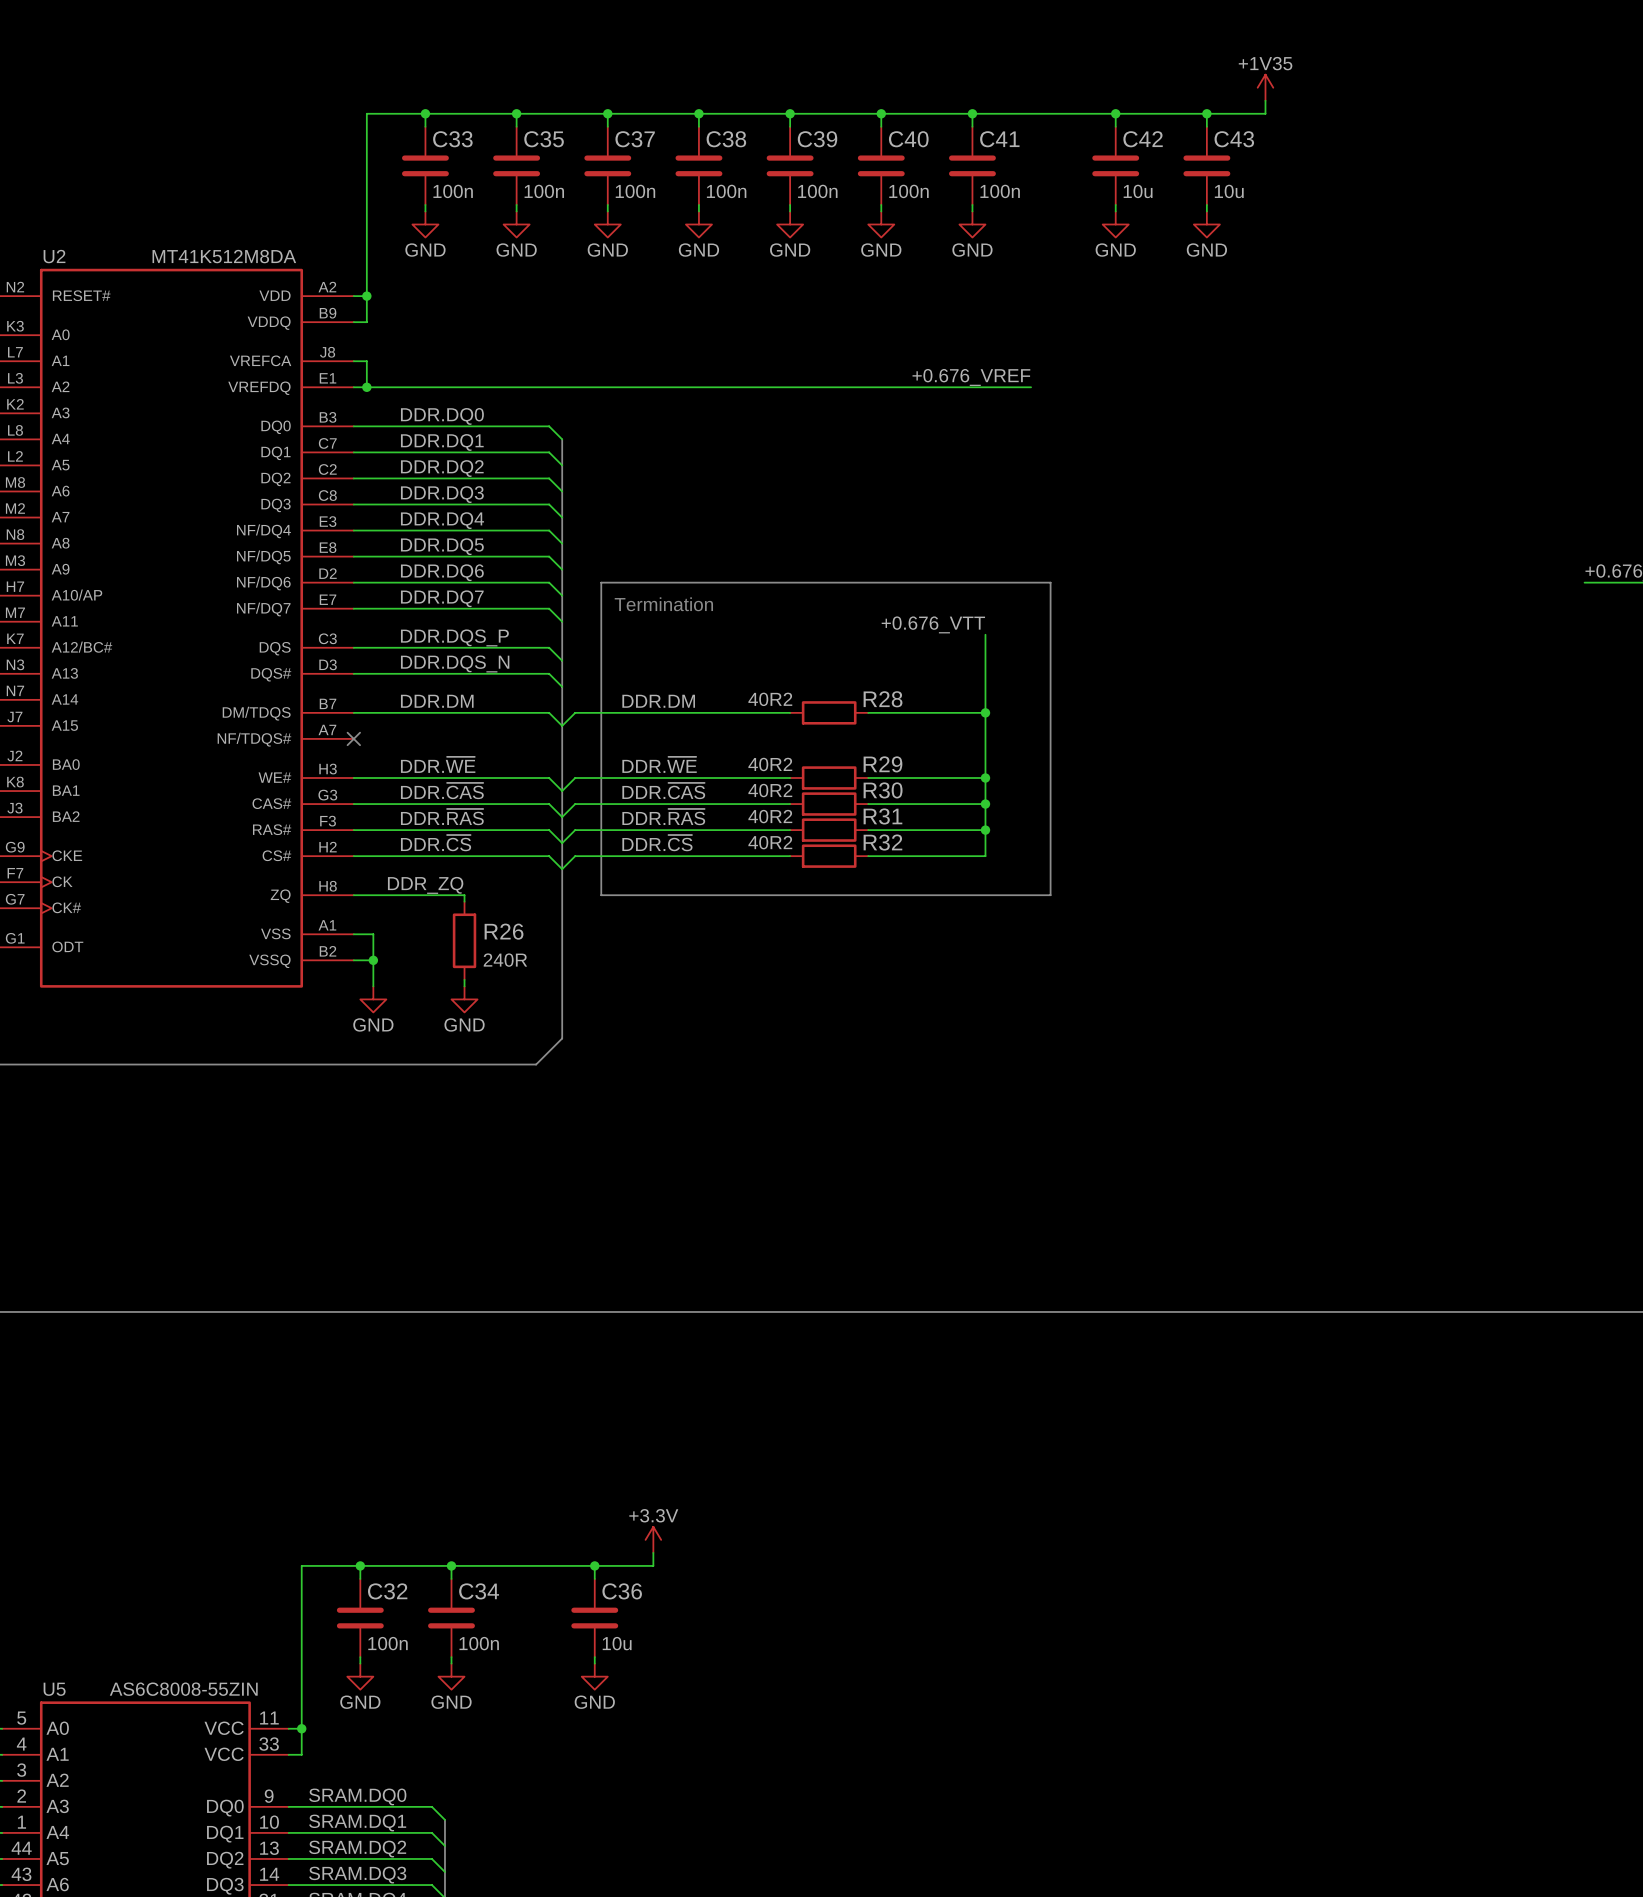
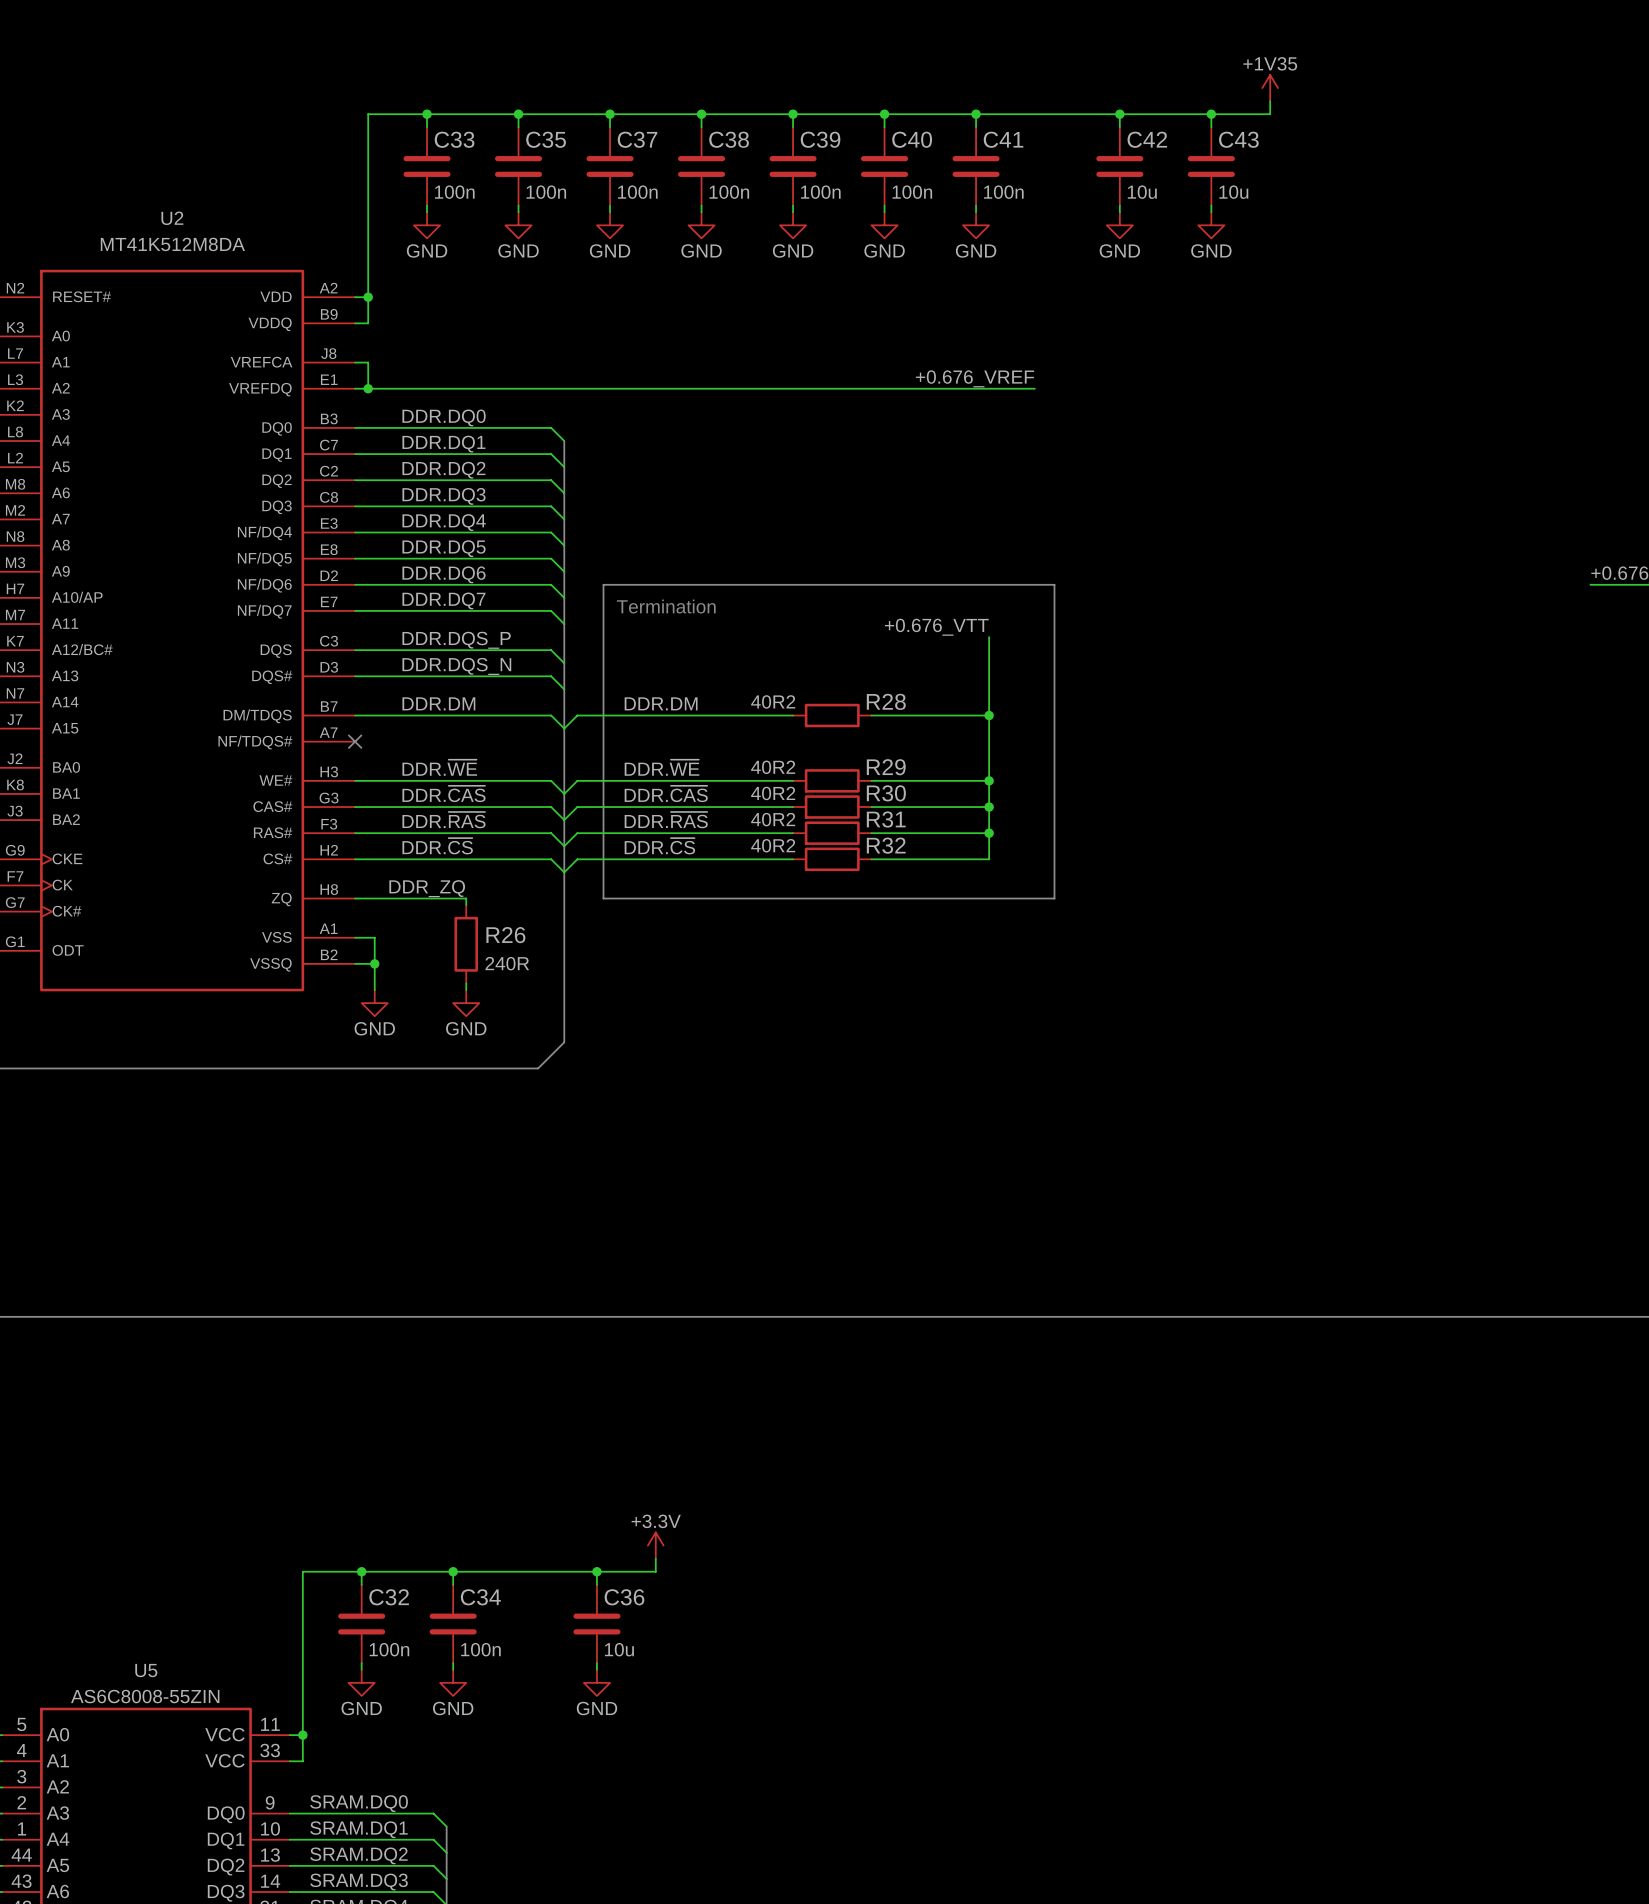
U2 name position: U2 (54, 256) -> U2 (172, 218)
U2 value position: MT41K512M8DA (224, 256) -> MT41K512M8DA (172, 244)
U5 name position: U5 (54, 1689) -> U5 (146, 1670)
U5 value position: AS6C8008-55ZIN (183, 1689) -> AS6C8008-55ZIN (145, 1696)

